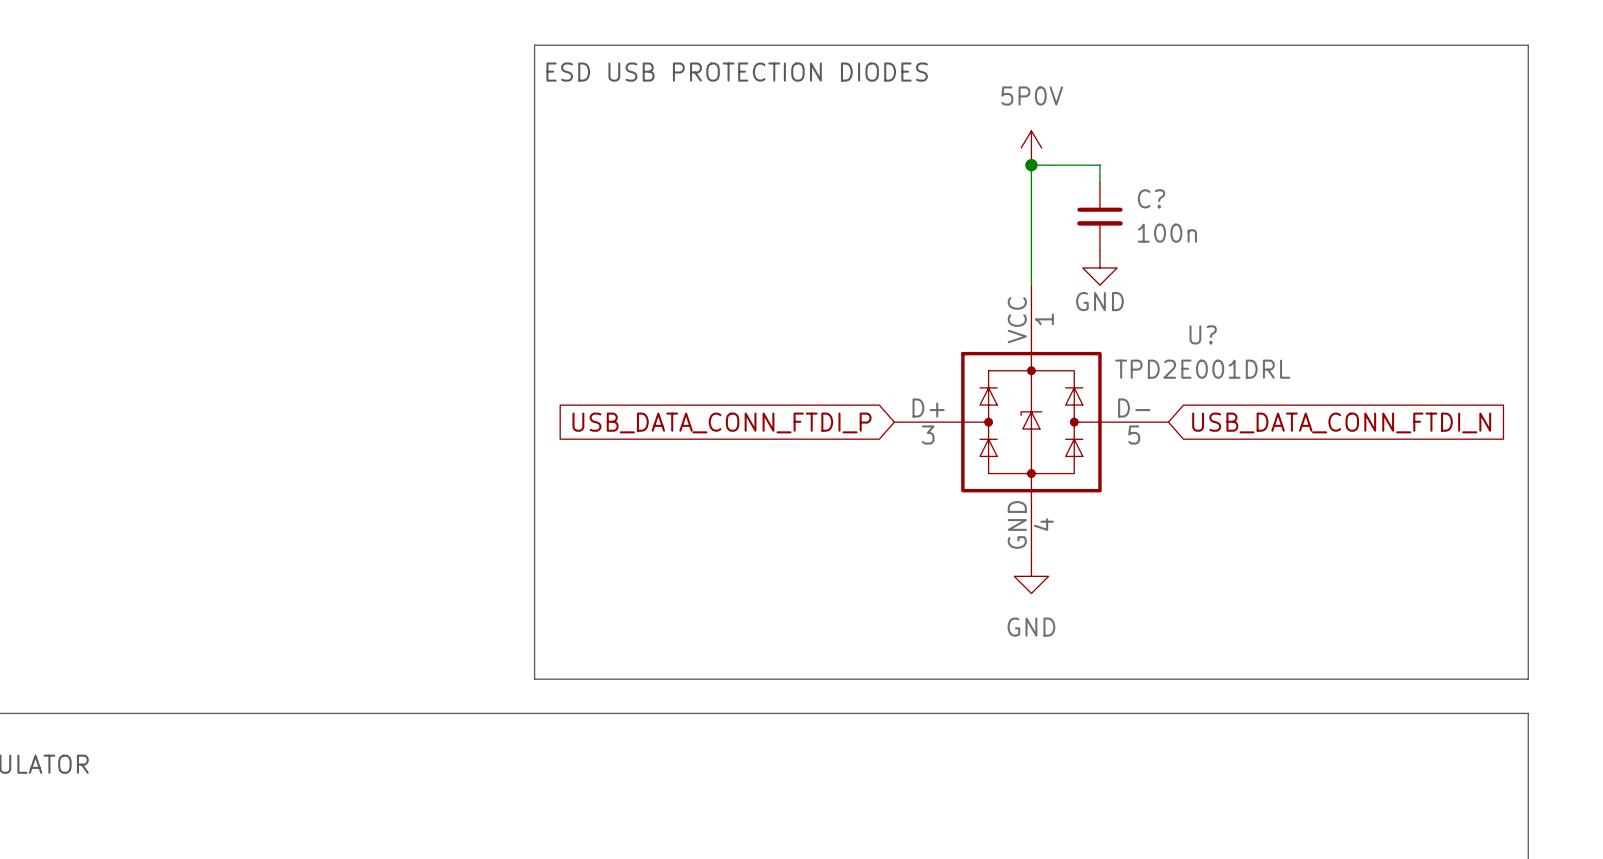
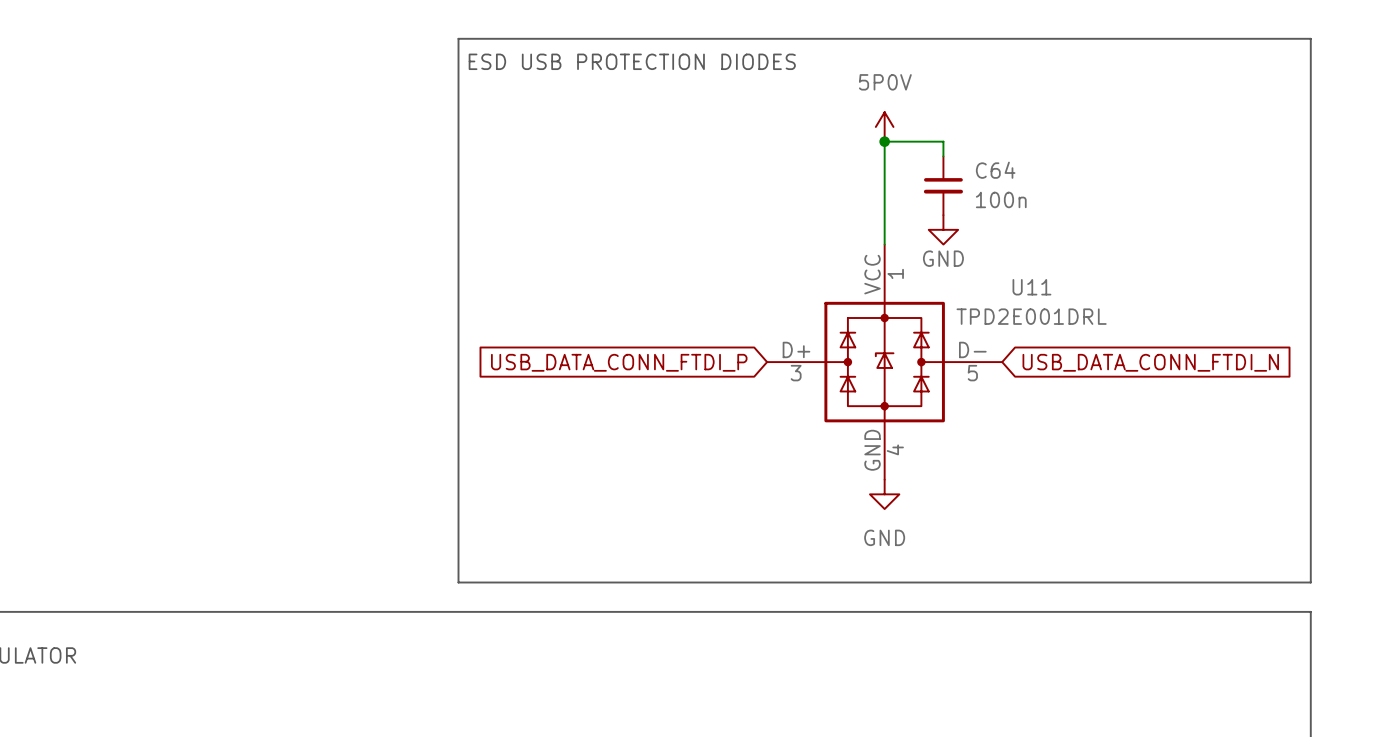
C? name: C? (1151, 198) -> C64 (995, 170)
U? name: U? (1203, 334) -> U11 (1031, 287)

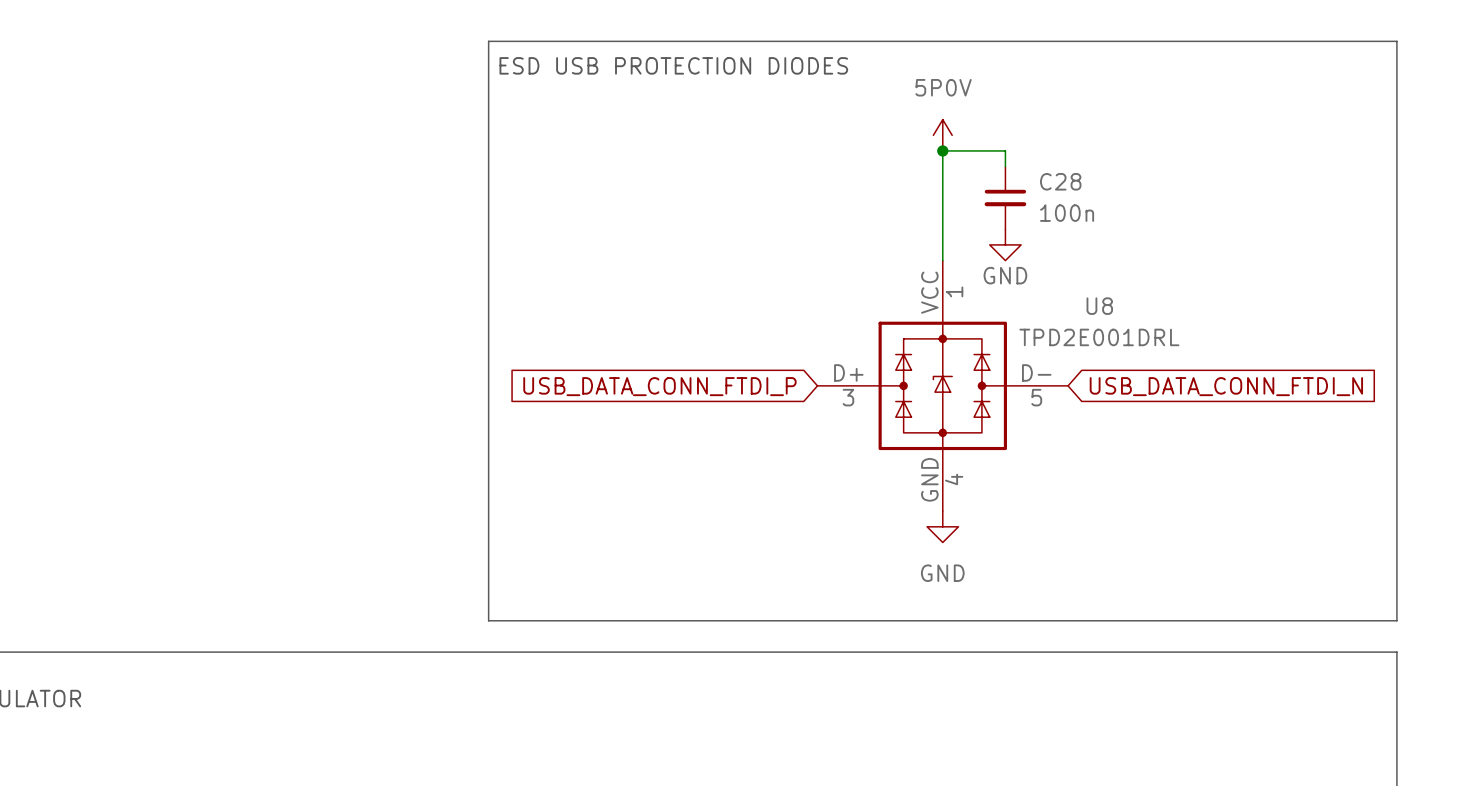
C64 name: C64 (995, 170) -> C28 (1060, 181)
U11 name: U11 (1031, 287) -> U8 (1099, 306)

